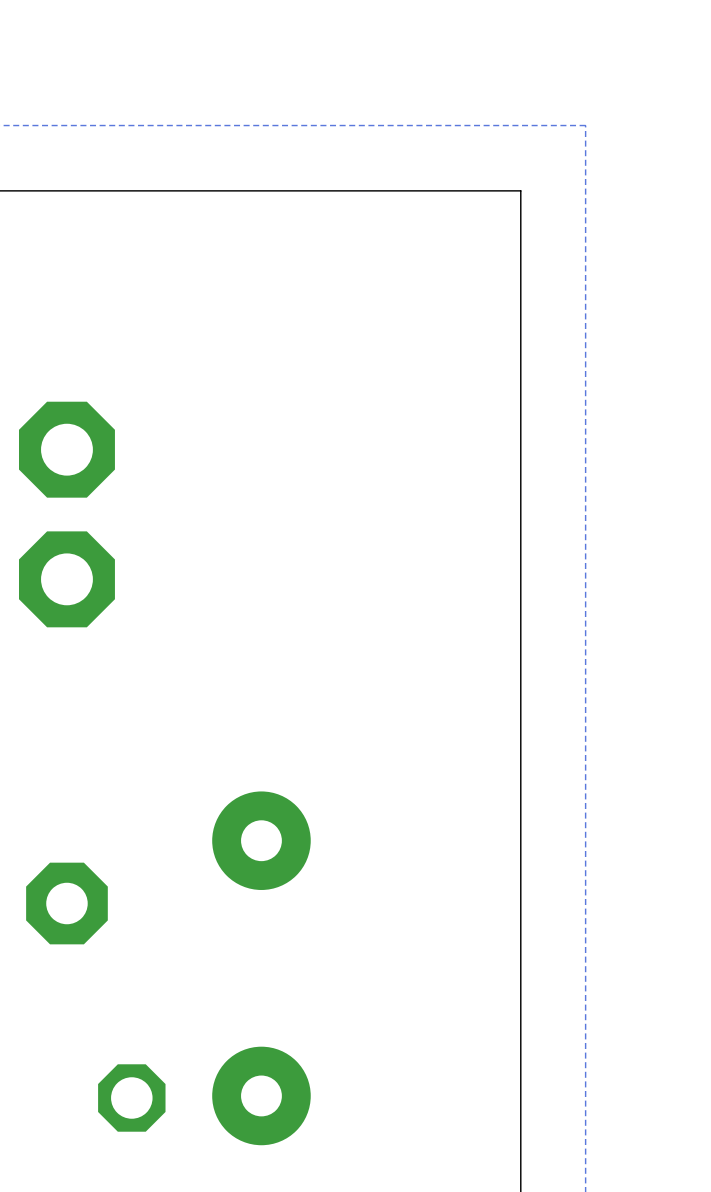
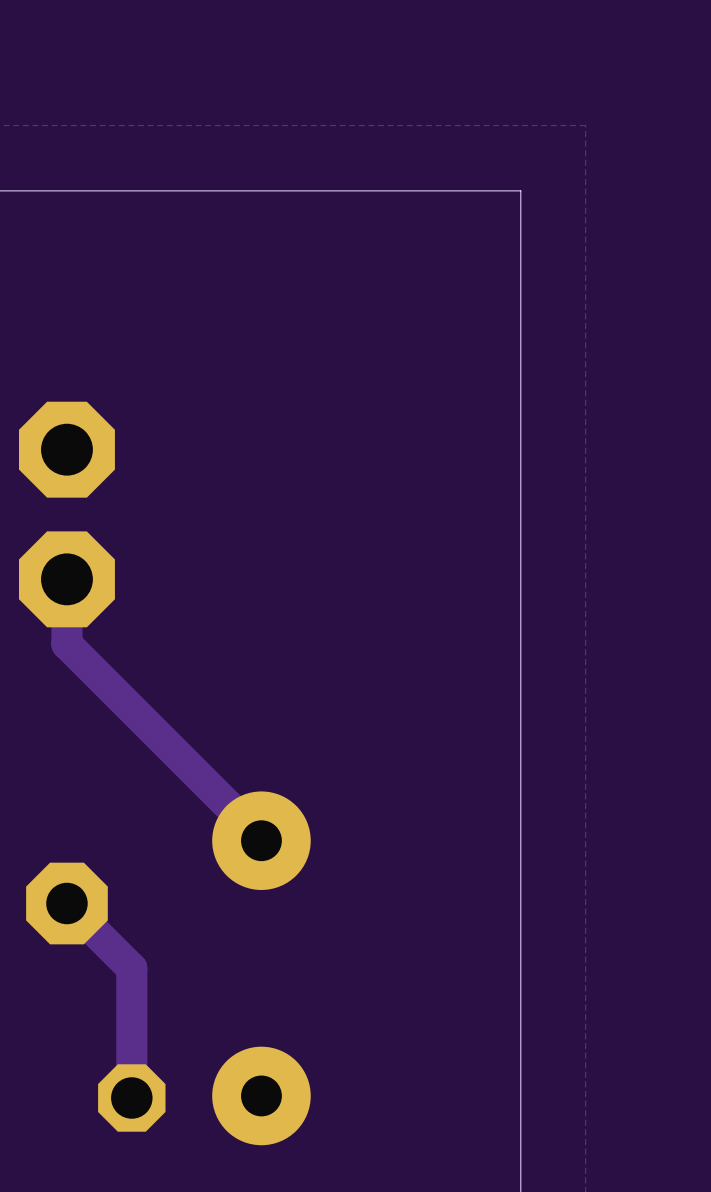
track: none -> (66, 579) (66, 644) (261, 840)
track: none -> (66, 903) (131, 968) (131, 1098)

